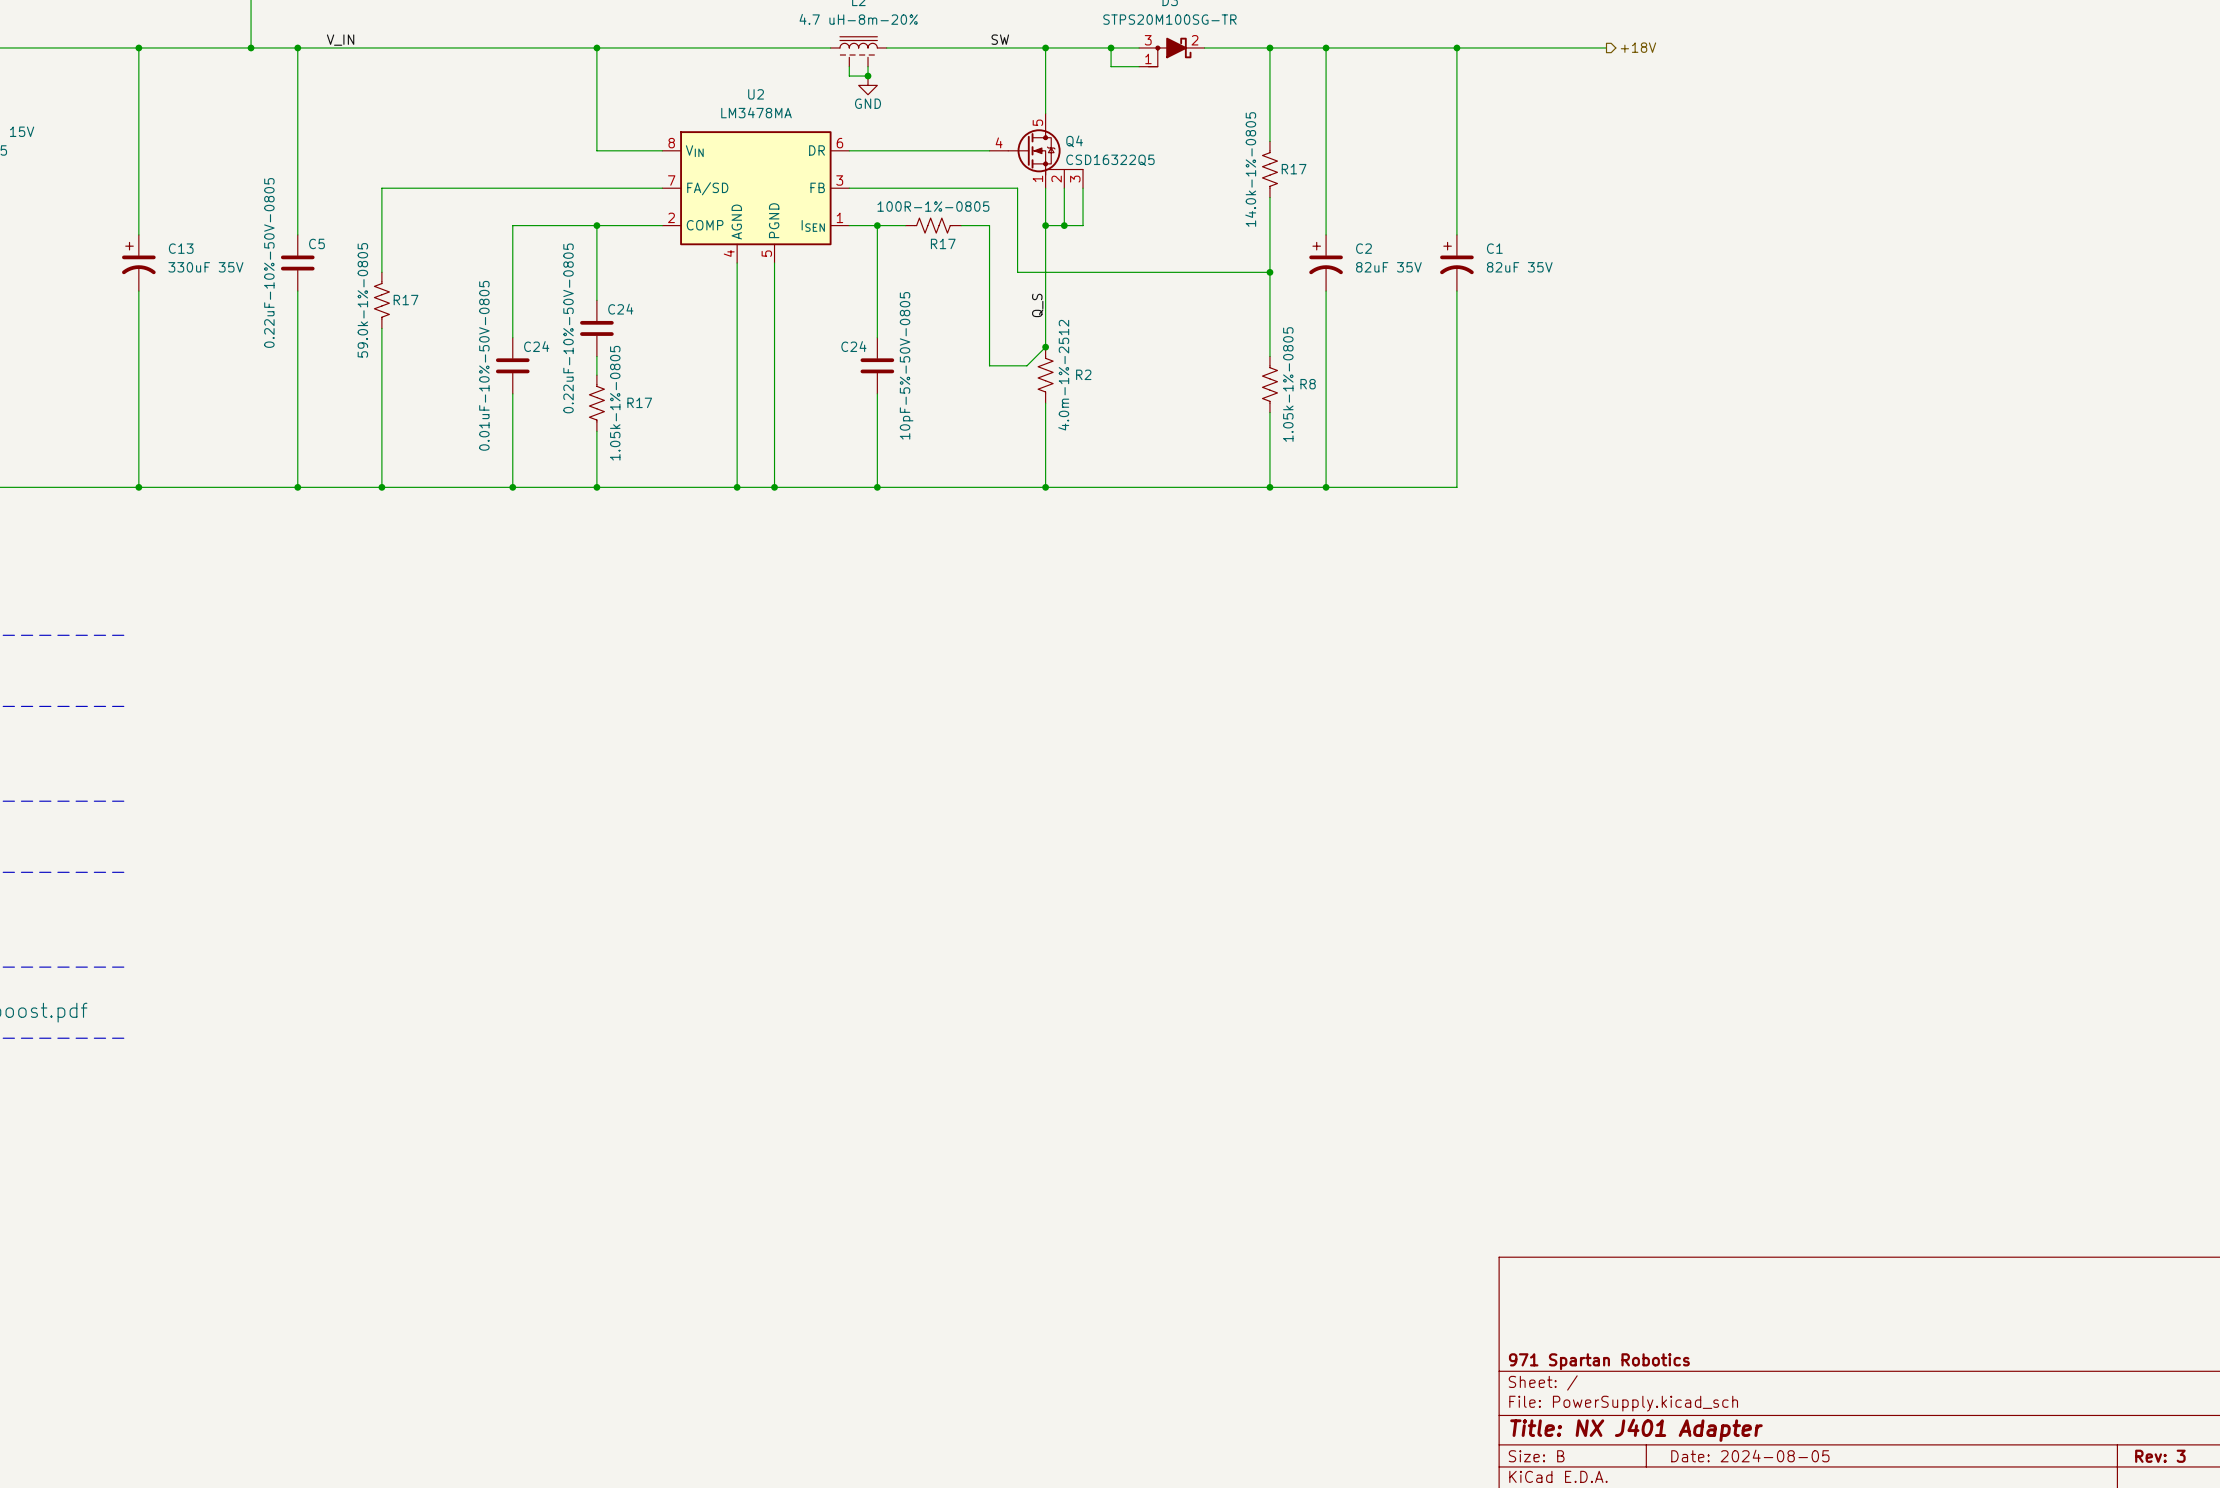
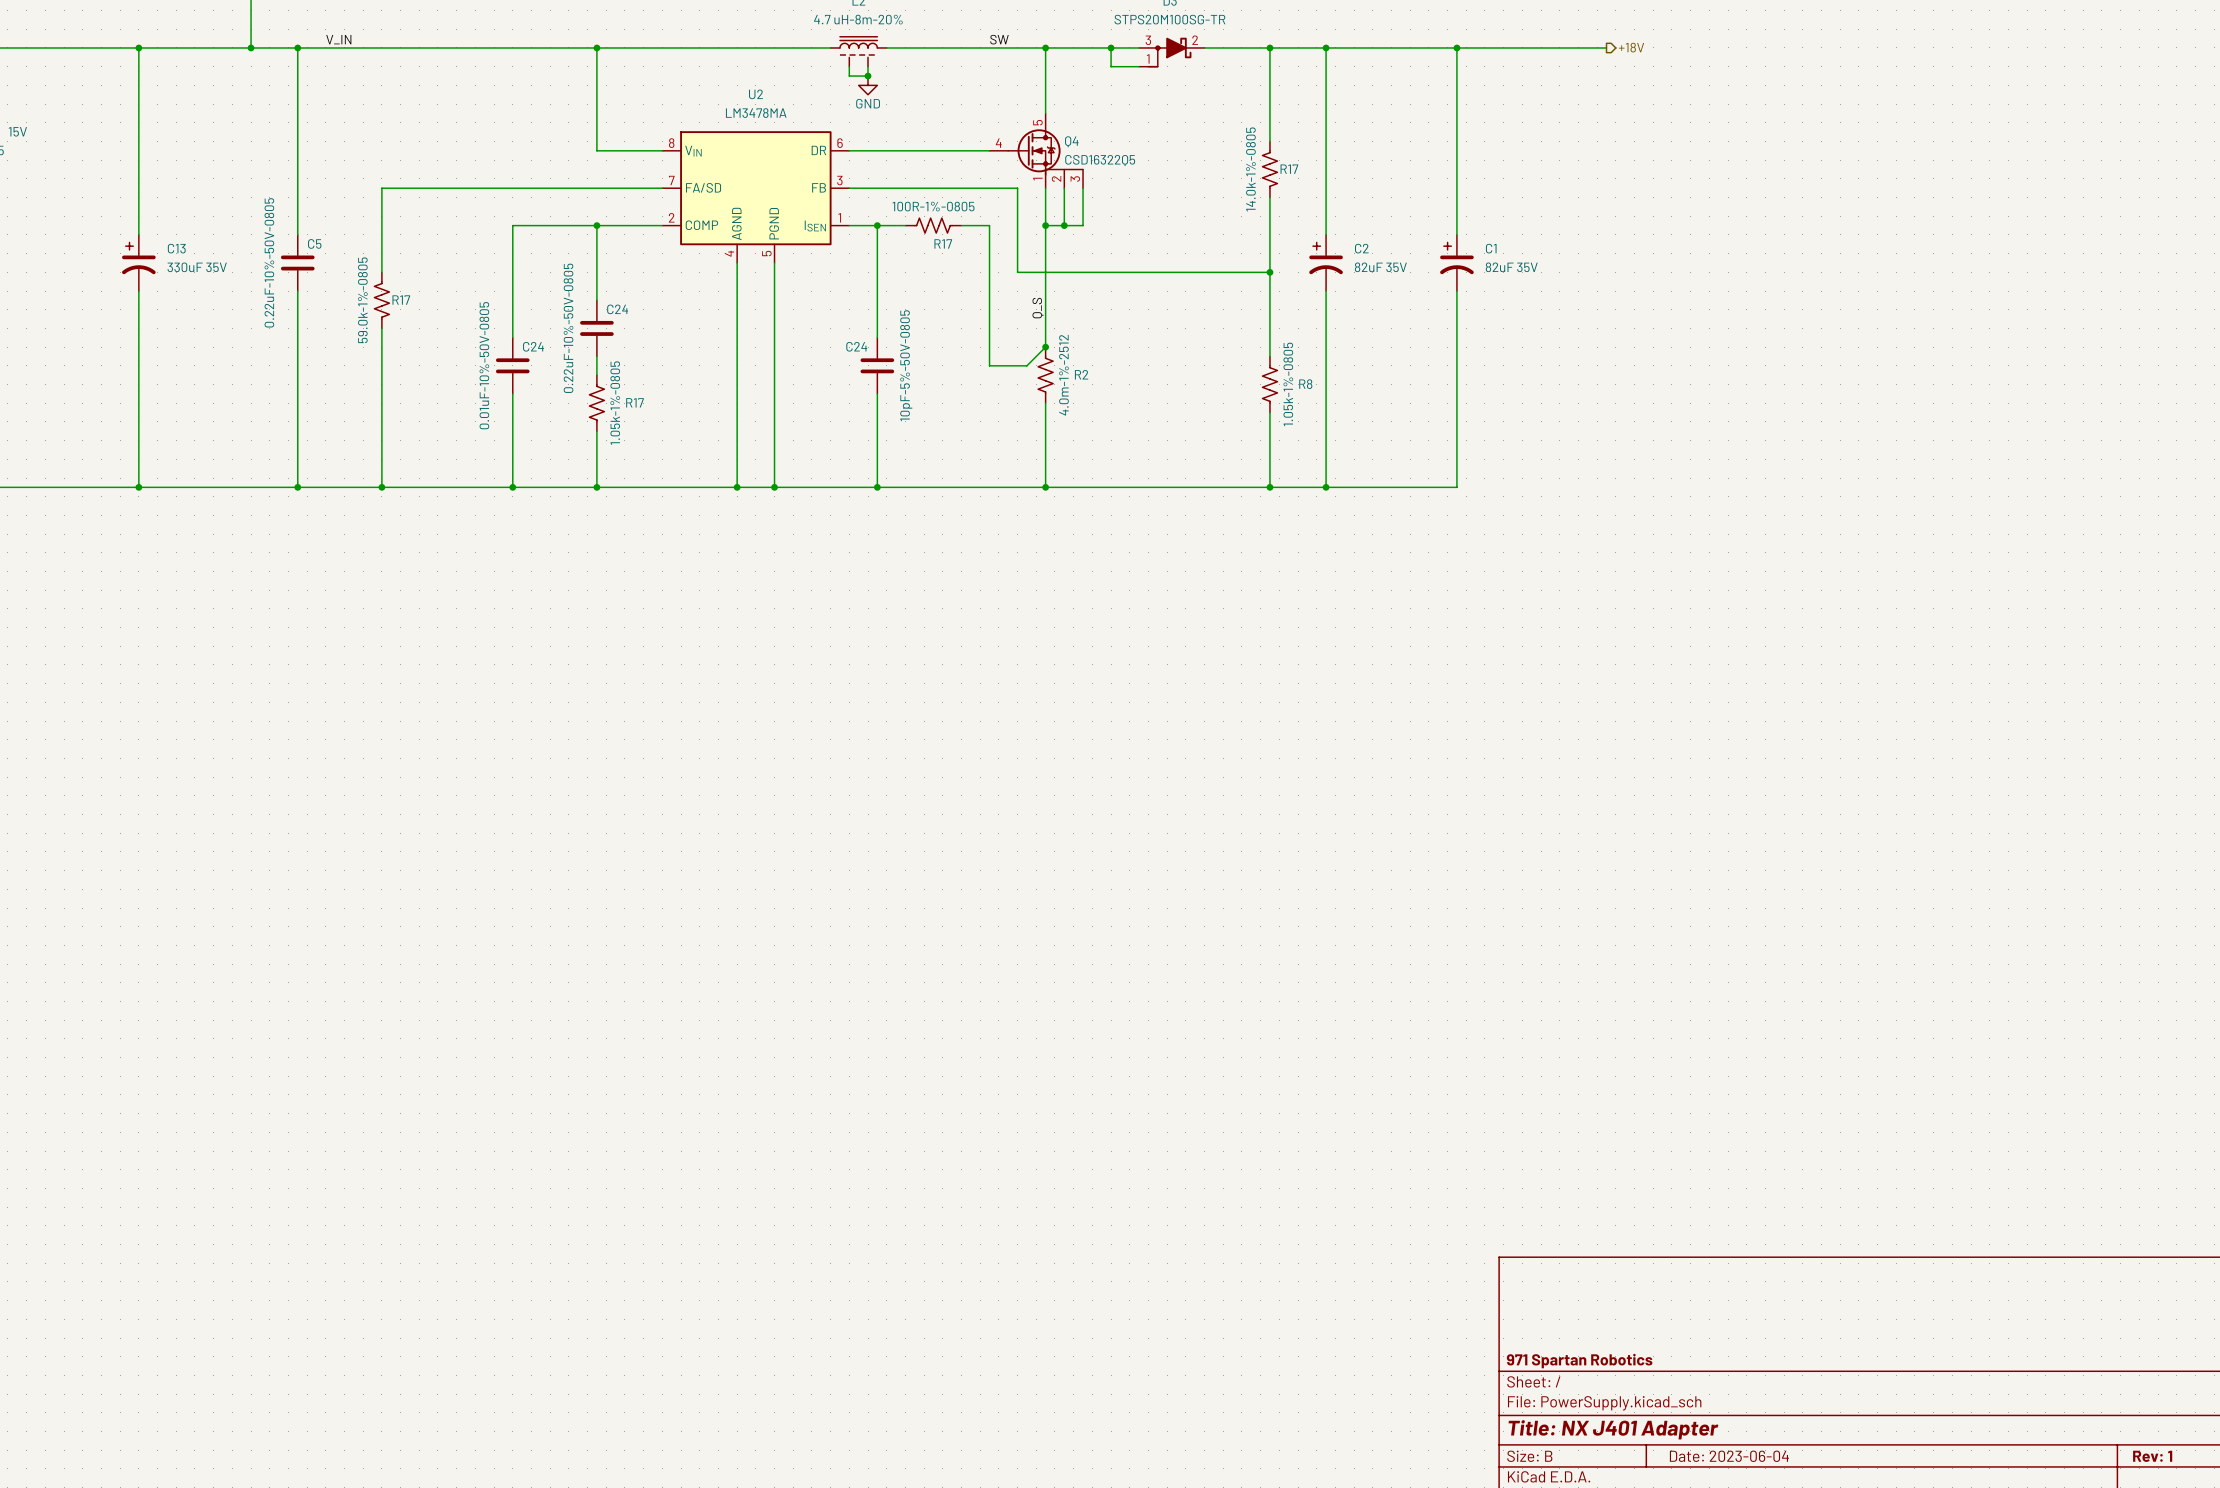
title block: Date: 2024-08-05 (1750, 1456) -> Date: 2023-06-04 (1729, 1456)
title block: Rev: 3 (2160, 1456) -> Rev: 1 (2152, 1456)

